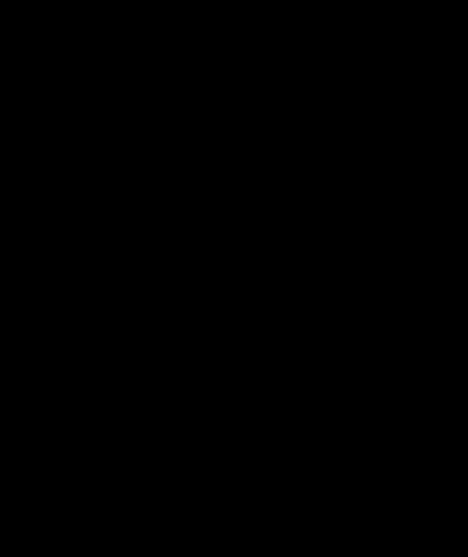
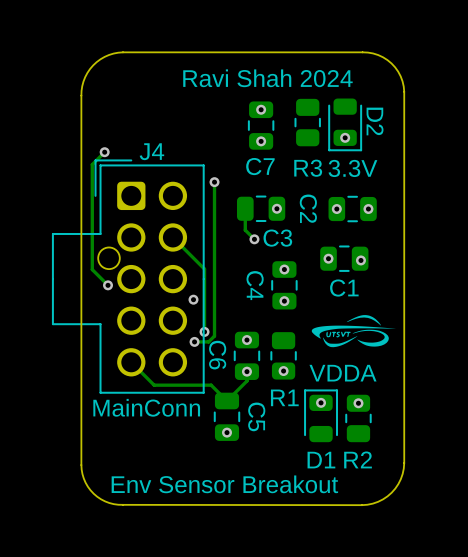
board edge: none -> (362, 52) (122, 52) (109, 54) (100, 59) (87, 72) (83, 81) (81, 95) (81, 465) (83, 478) (87, 486) (101, 499) (118, 504) (362, 505) (383, 499) (398, 484) (404, 463) (404, 91) (400, 76) (391, 63) (378, 55) (362, 52)
text: none -> Ravi Shah 2024 (267, 78)
via: none -> (261, 109)
R3: none -> (307, 122)
D2: none -> (345, 124)
C7: none -> (261, 125)
via: none -> (345, 137)
via: none -> (261, 141)
track: none -> (104, 152) (92, 164) (92, 269) (108, 285)
via: none -> (104, 152)
text: none -> 3.3V (352, 168)
track: none -> (214, 182) (214, 336) (208, 341) (194, 341)
via: none -> (214, 182)
track: none -> (245, 208) (245, 230) (254, 239)
C3: none -> (261, 208)
via: none -> (276, 208)
via: none -> (336, 209)
C2: none -> (352, 209)
via: none -> (368, 209)
track: none -> (172, 237) (204, 269) (204, 331)
via: none -> (254, 239)
via: none -> (328, 258)
C1: none -> (344, 258)
via: none -> (360, 260)
via: none -> (284, 269)
J4: none -> (128, 276)
via: none -> (108, 285)
C4: none -> (284, 285)
via: none -> (193, 299)
via: none -> (284, 301)
drawing: none -> [311, 315, 396, 348]
via: none -> (204, 331)
via: none -> (246, 340)
via: none -> (194, 341)
C6: none -> (246, 355)
R1: none -> (283, 355)
track: none -> (131, 362) (154, 385) (211, 385) (227, 400) (246, 381) (246, 371)
via: none -> (246, 371)
via: none -> (283, 371)
text: none -> VDDA (343, 373)
via: none -> (321, 402)
via: none -> (358, 403)
text: none -> MainConn (146, 407)
D1: none -> (321, 415)
C5: none -> (227, 416)
R2: none -> (358, 418)
via: none -> (227, 432)
text: none -> Env Sensor Breakout (224, 484)

